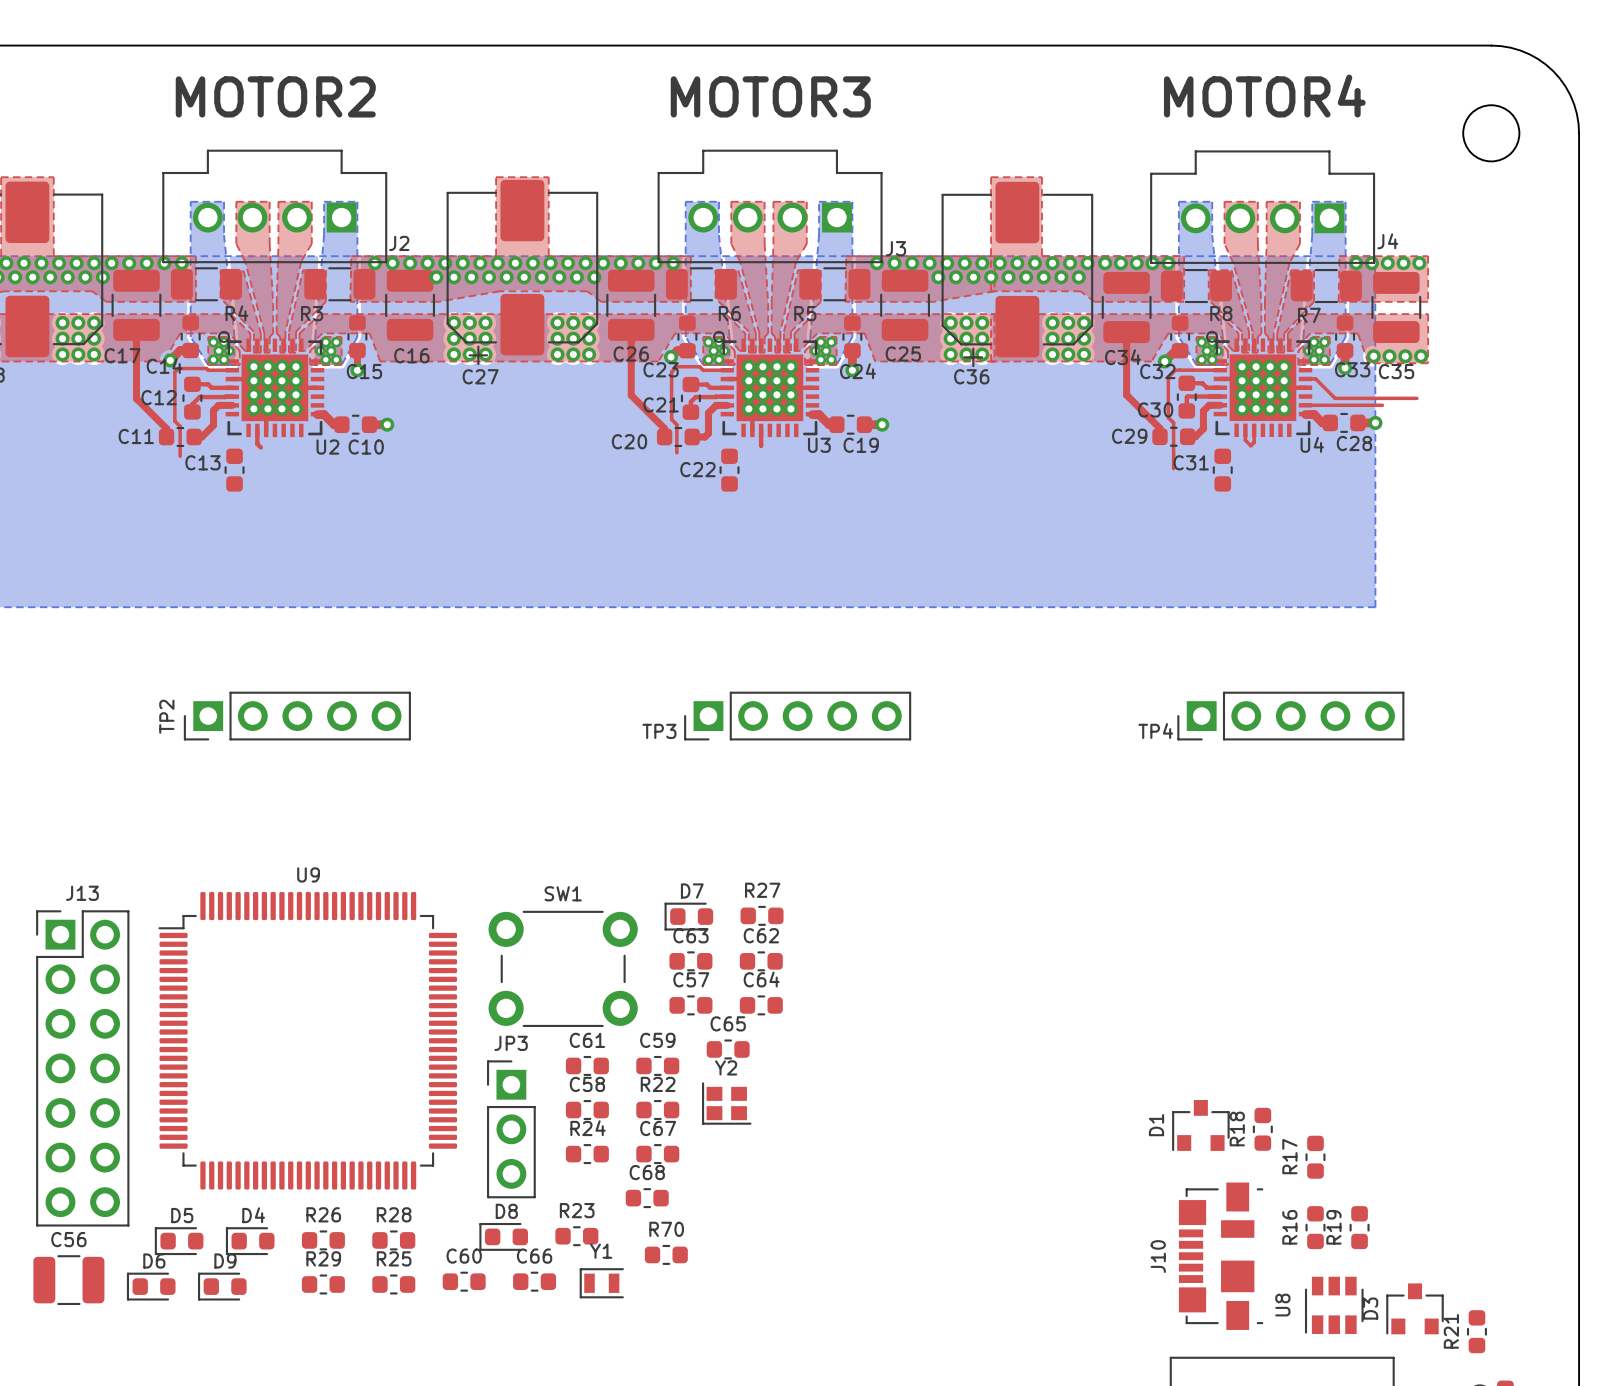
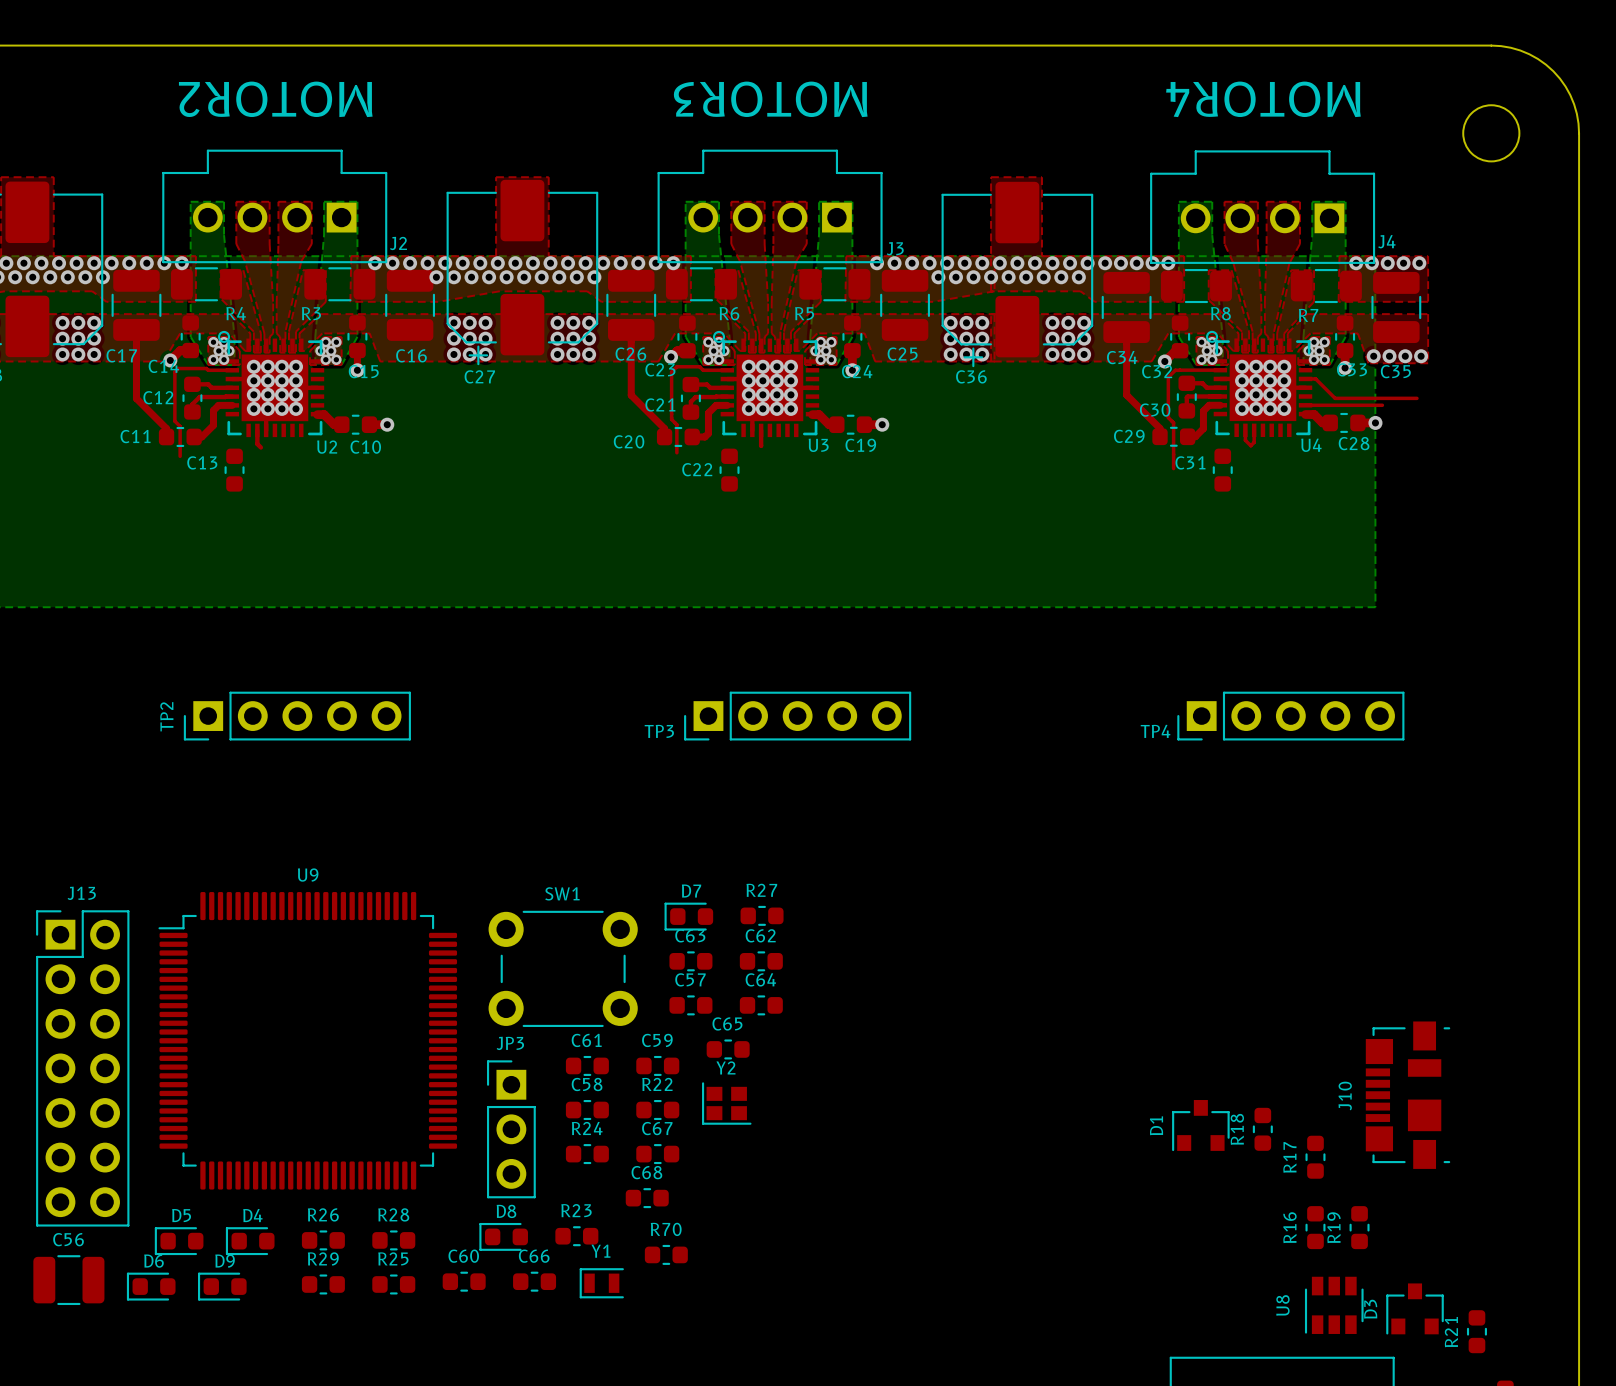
text rotation: 0° (275, 96) -> 180° (275, 99)
text rotation: 0° (770, 96) -> 180° (770, 99)
text rotation: 0° (1264, 96) -> 180° (1263, 99)
J10 position: (1221, 1256) -> (1408, 1095)

